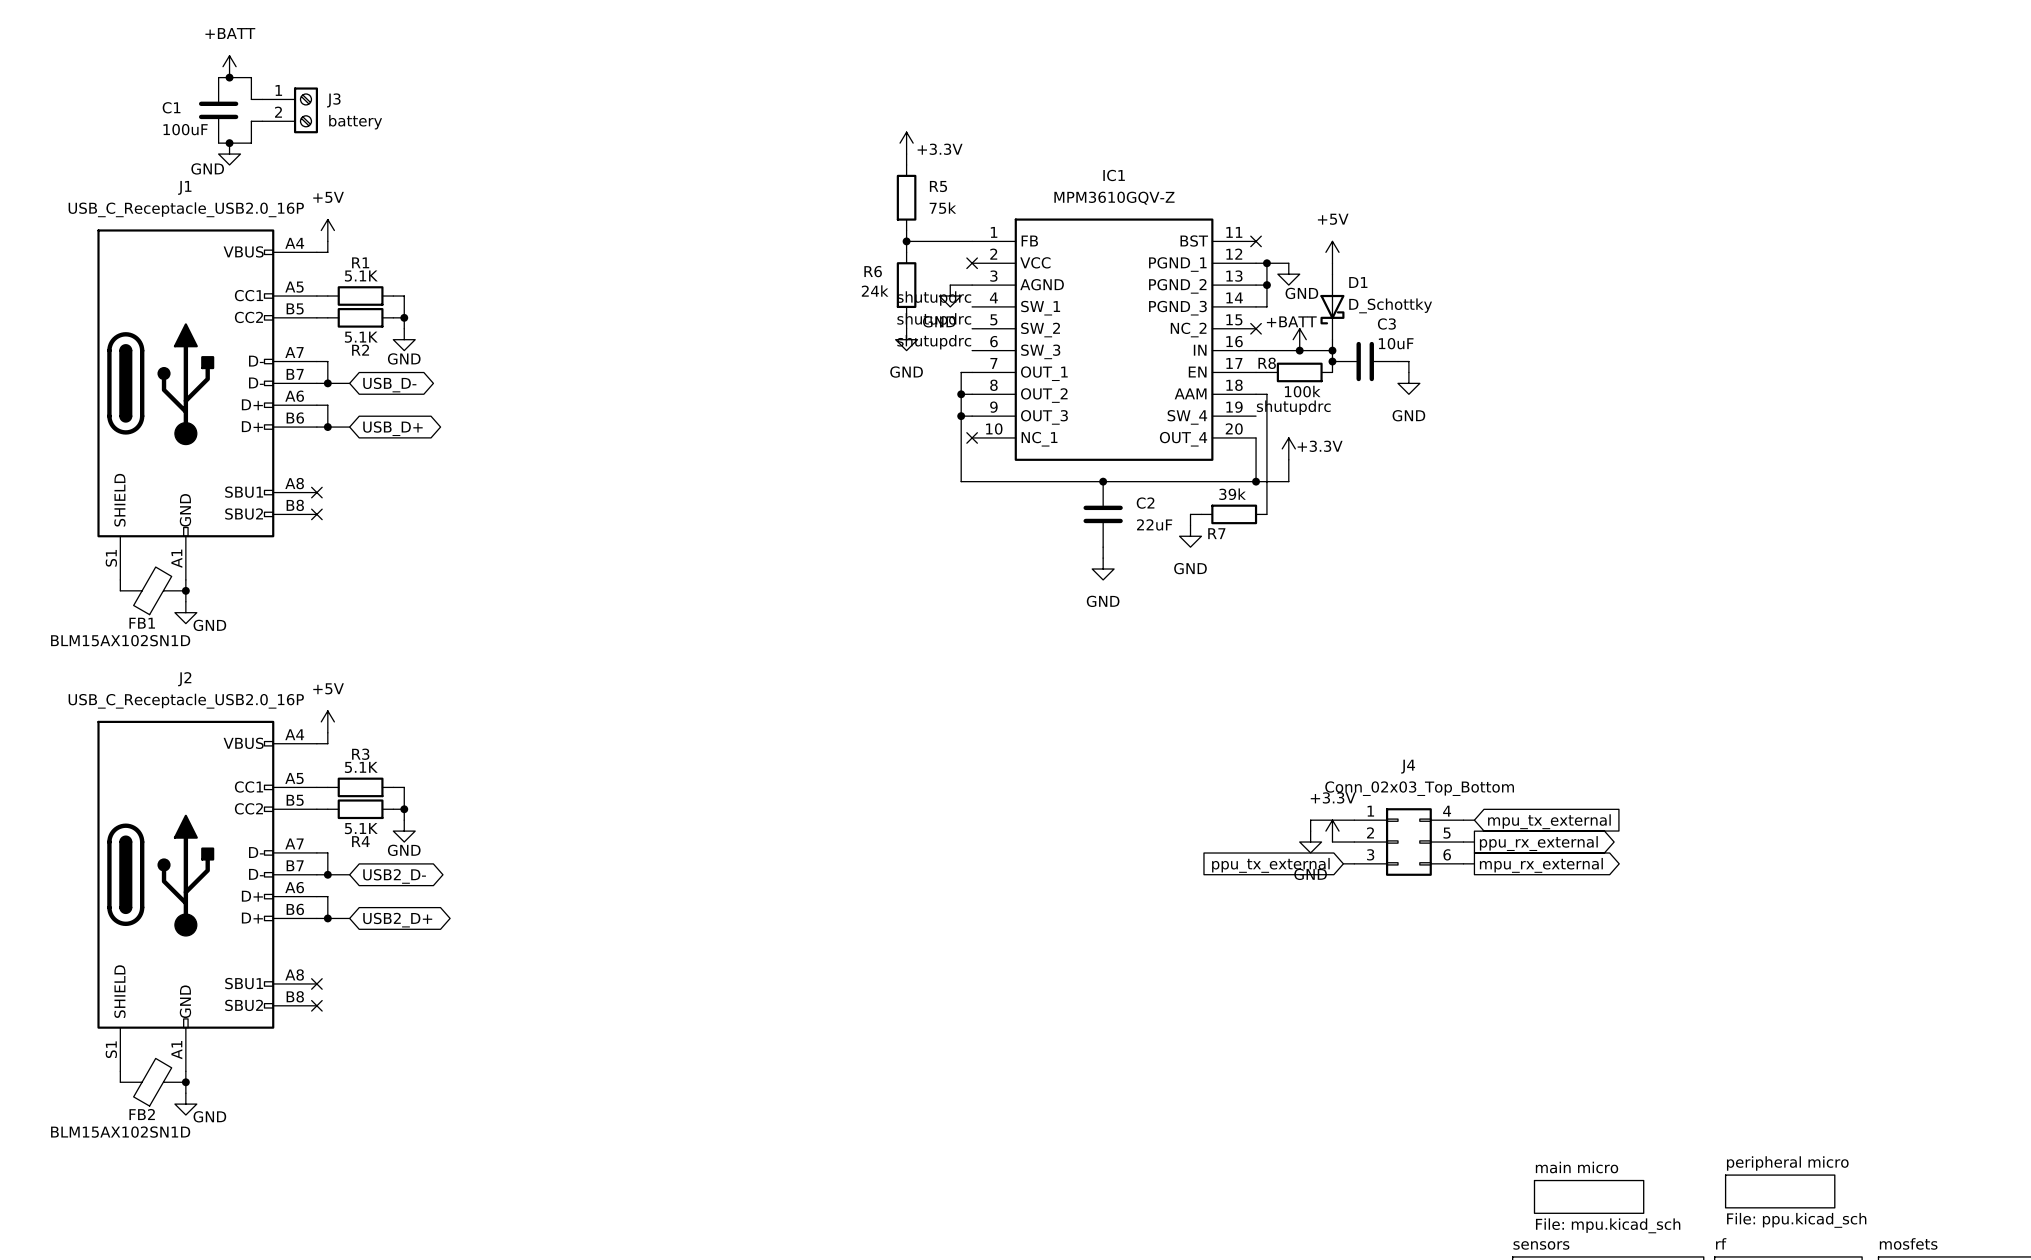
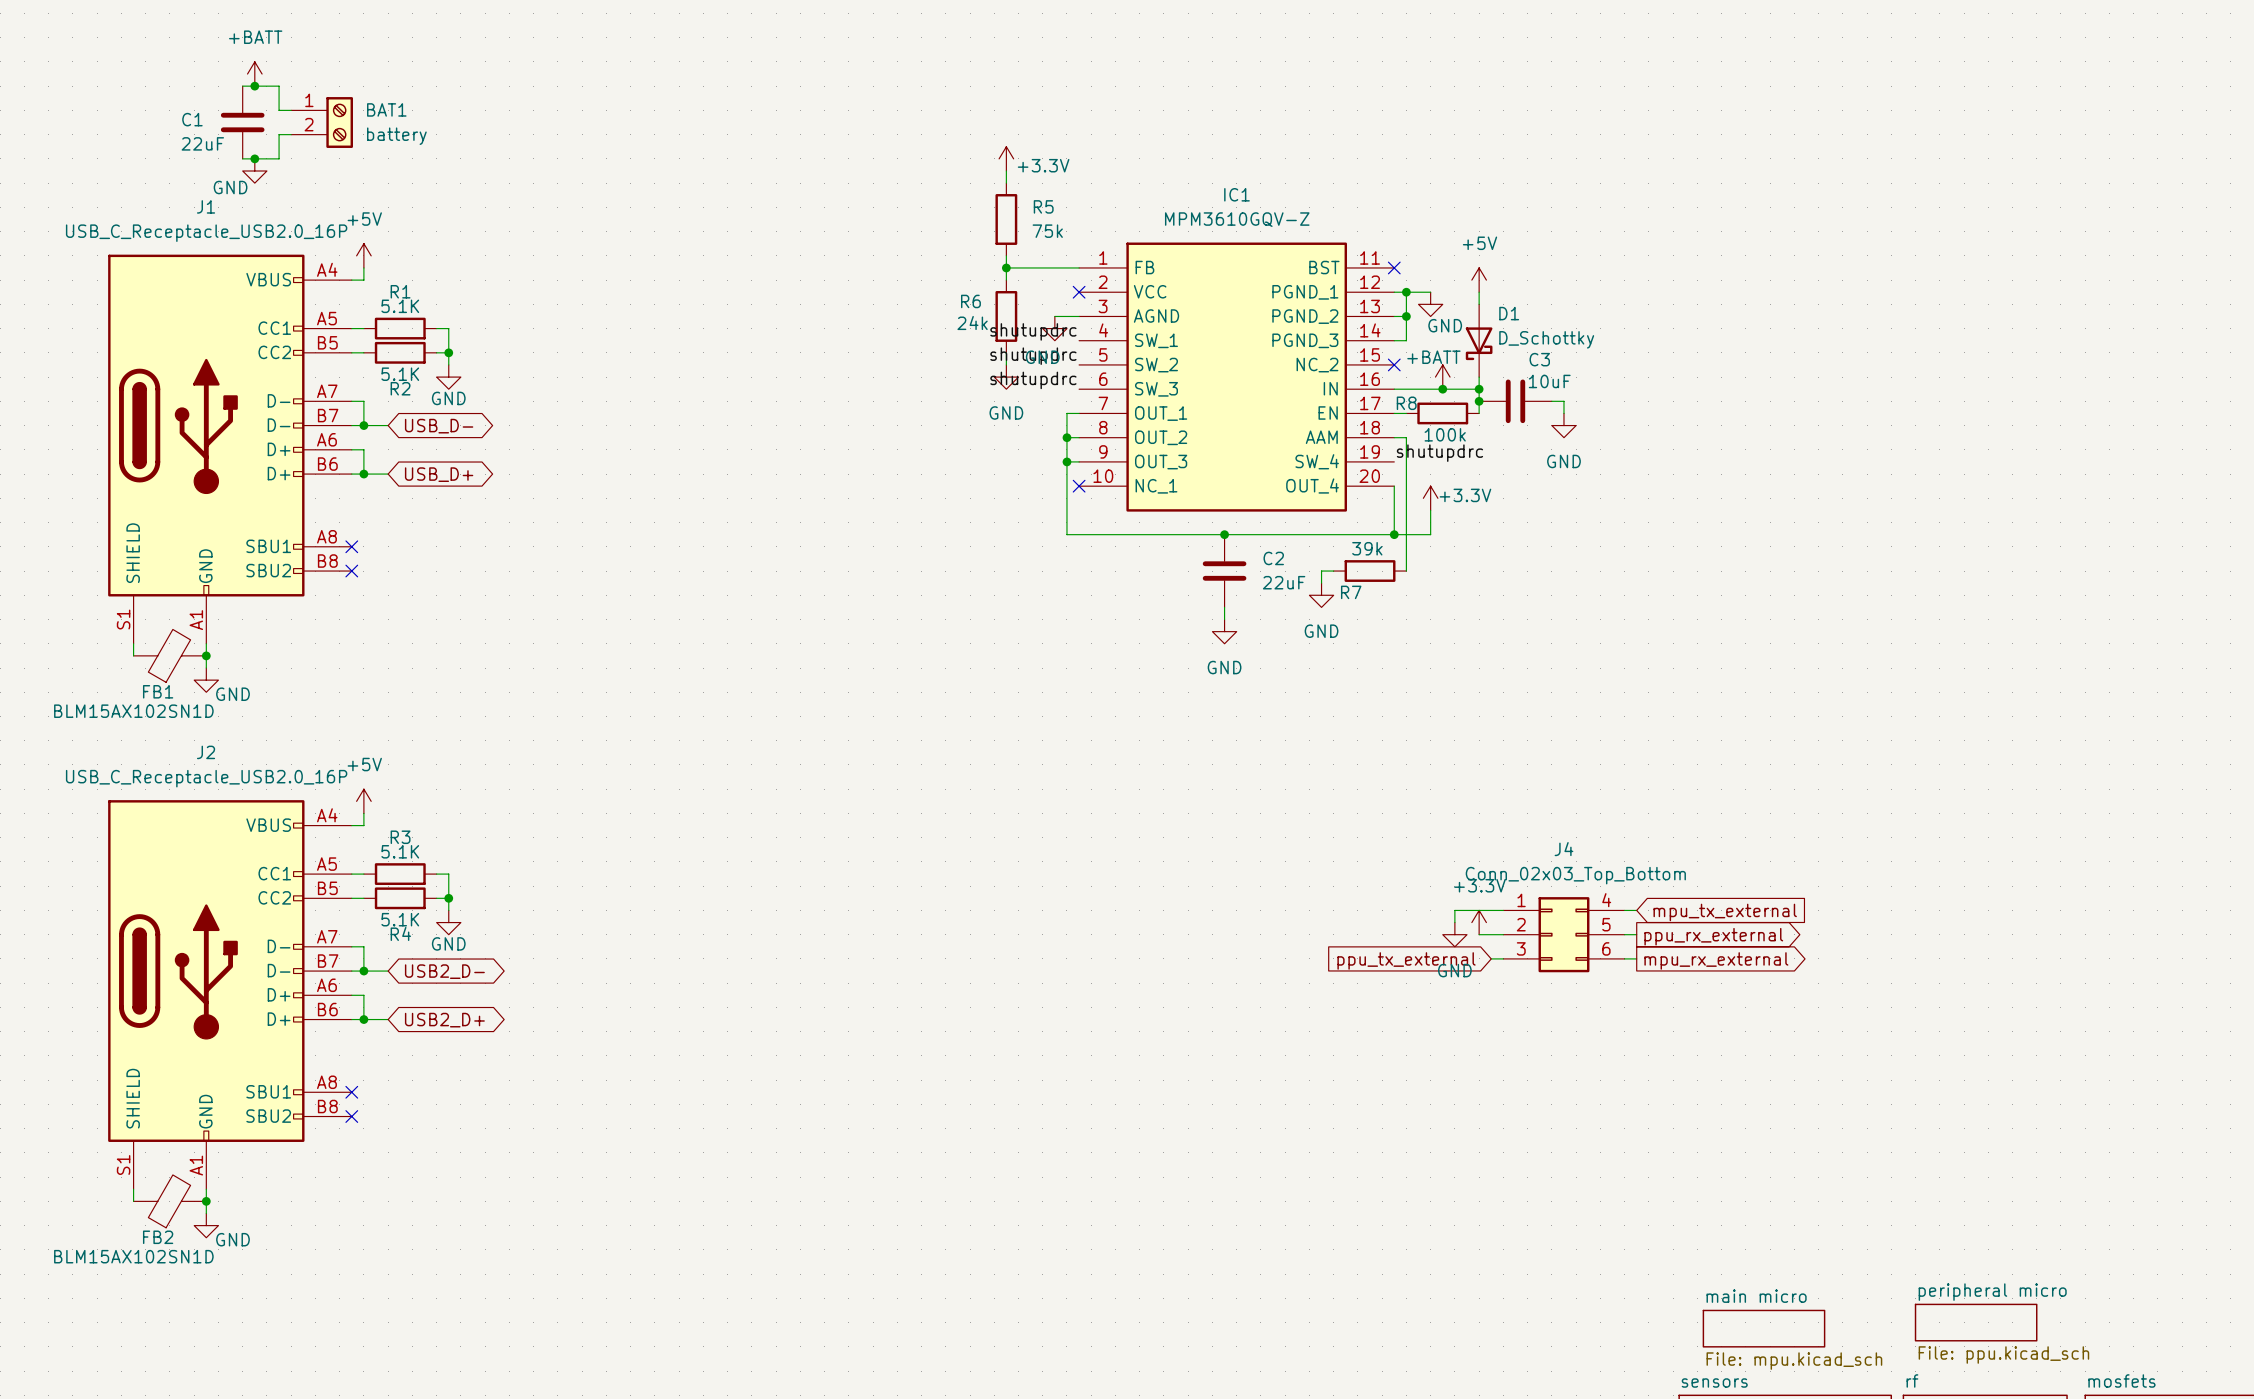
J3 name: J3 (333, 100) -> BAT1 (386, 109)
C1 value: 100uF (185, 129) -> 22uF (202, 143)

